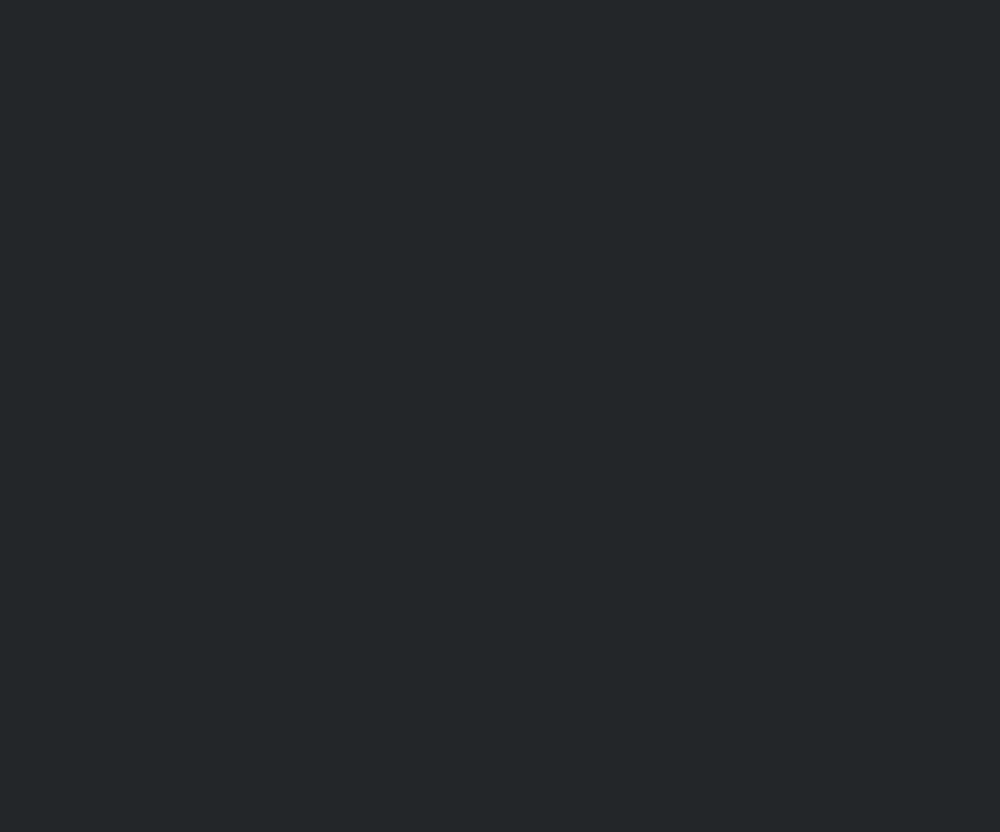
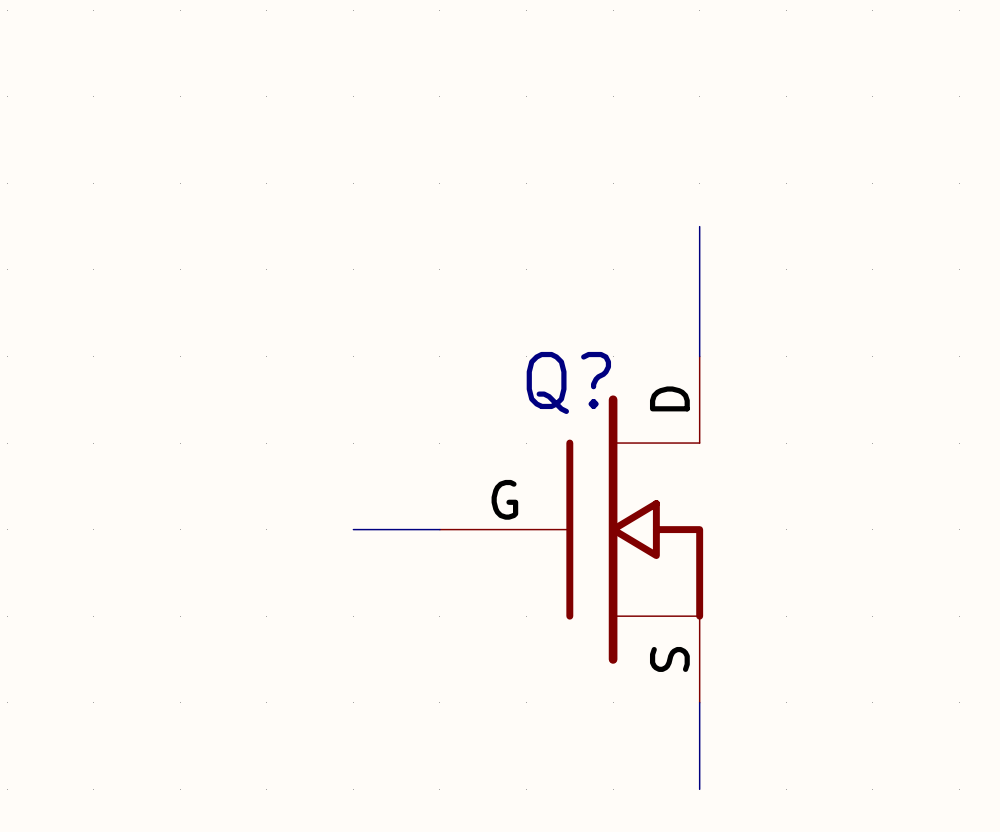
wire: none -> (699, 226) (699, 356)
wire: none -> (353, 529) (439, 529)
Q?: none -> (571, 529)
wire: none -> (699, 702) (699, 789)

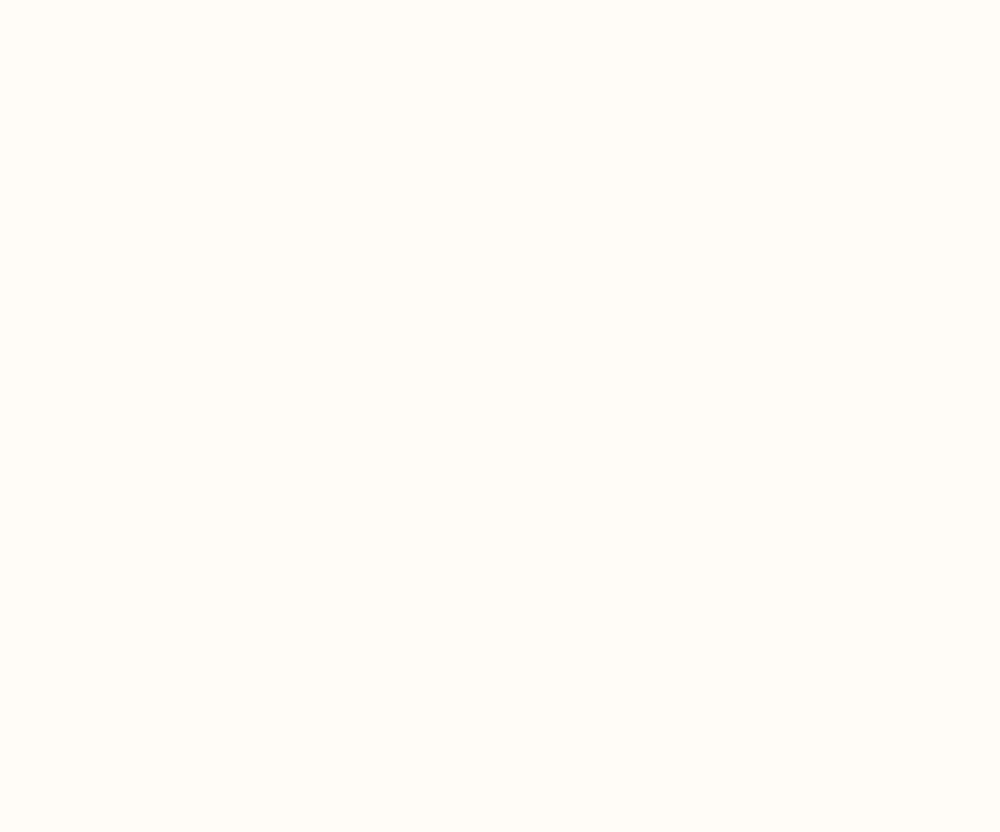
wire: (699, 226) (699, 356) -> none
wire: (353, 529) (439, 529) -> none
Q?: (571, 529) -> none
wire: (699, 702) (699, 789) -> none

